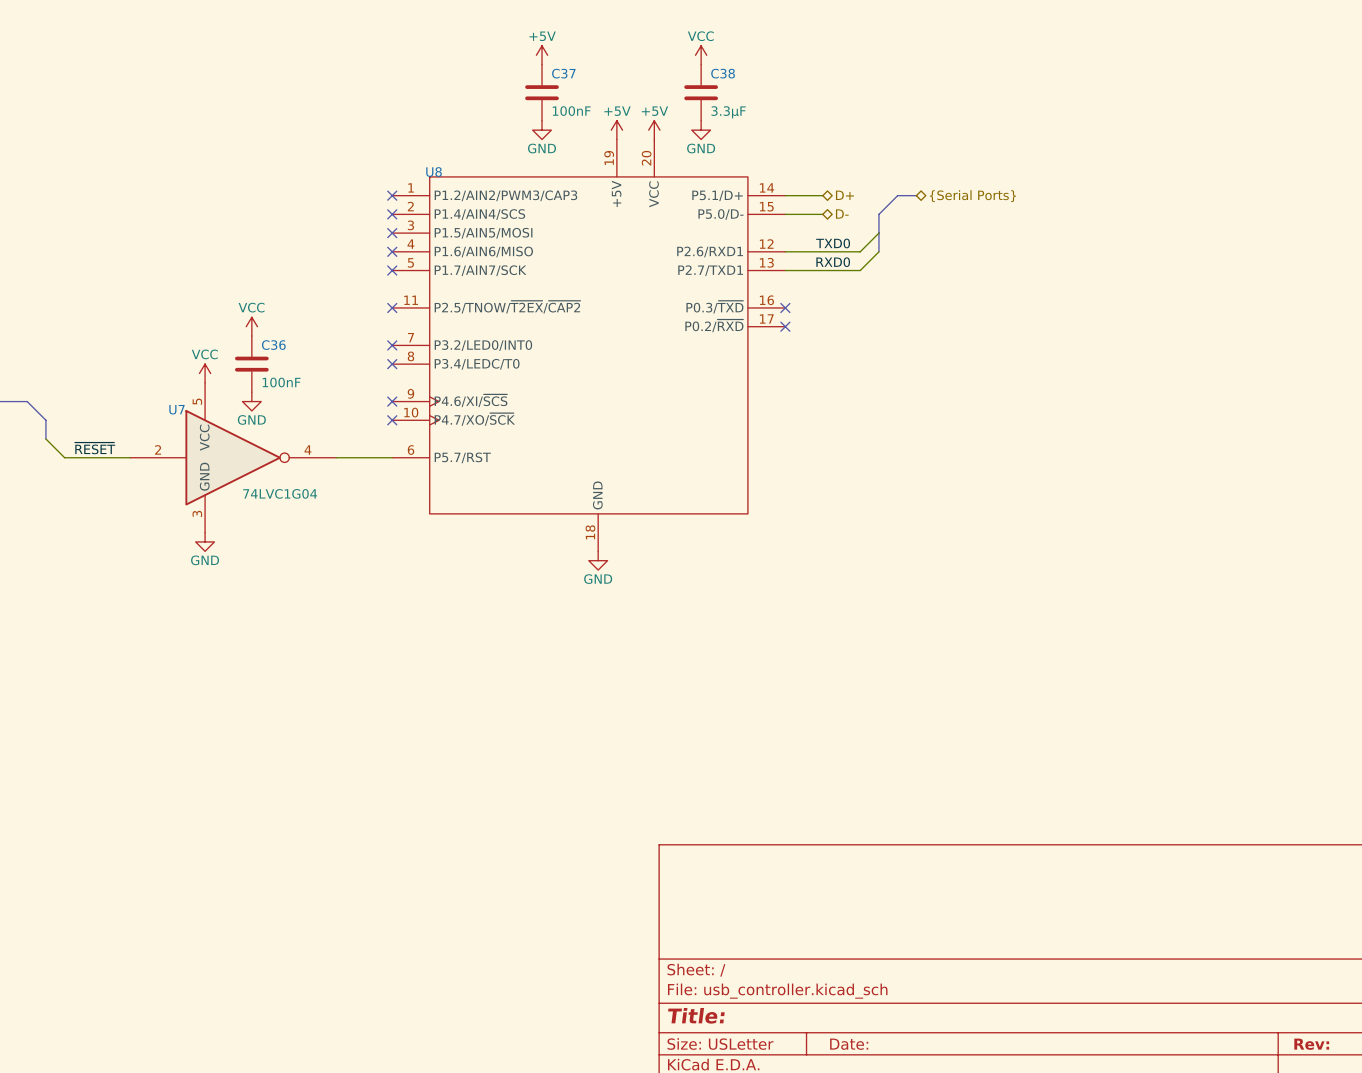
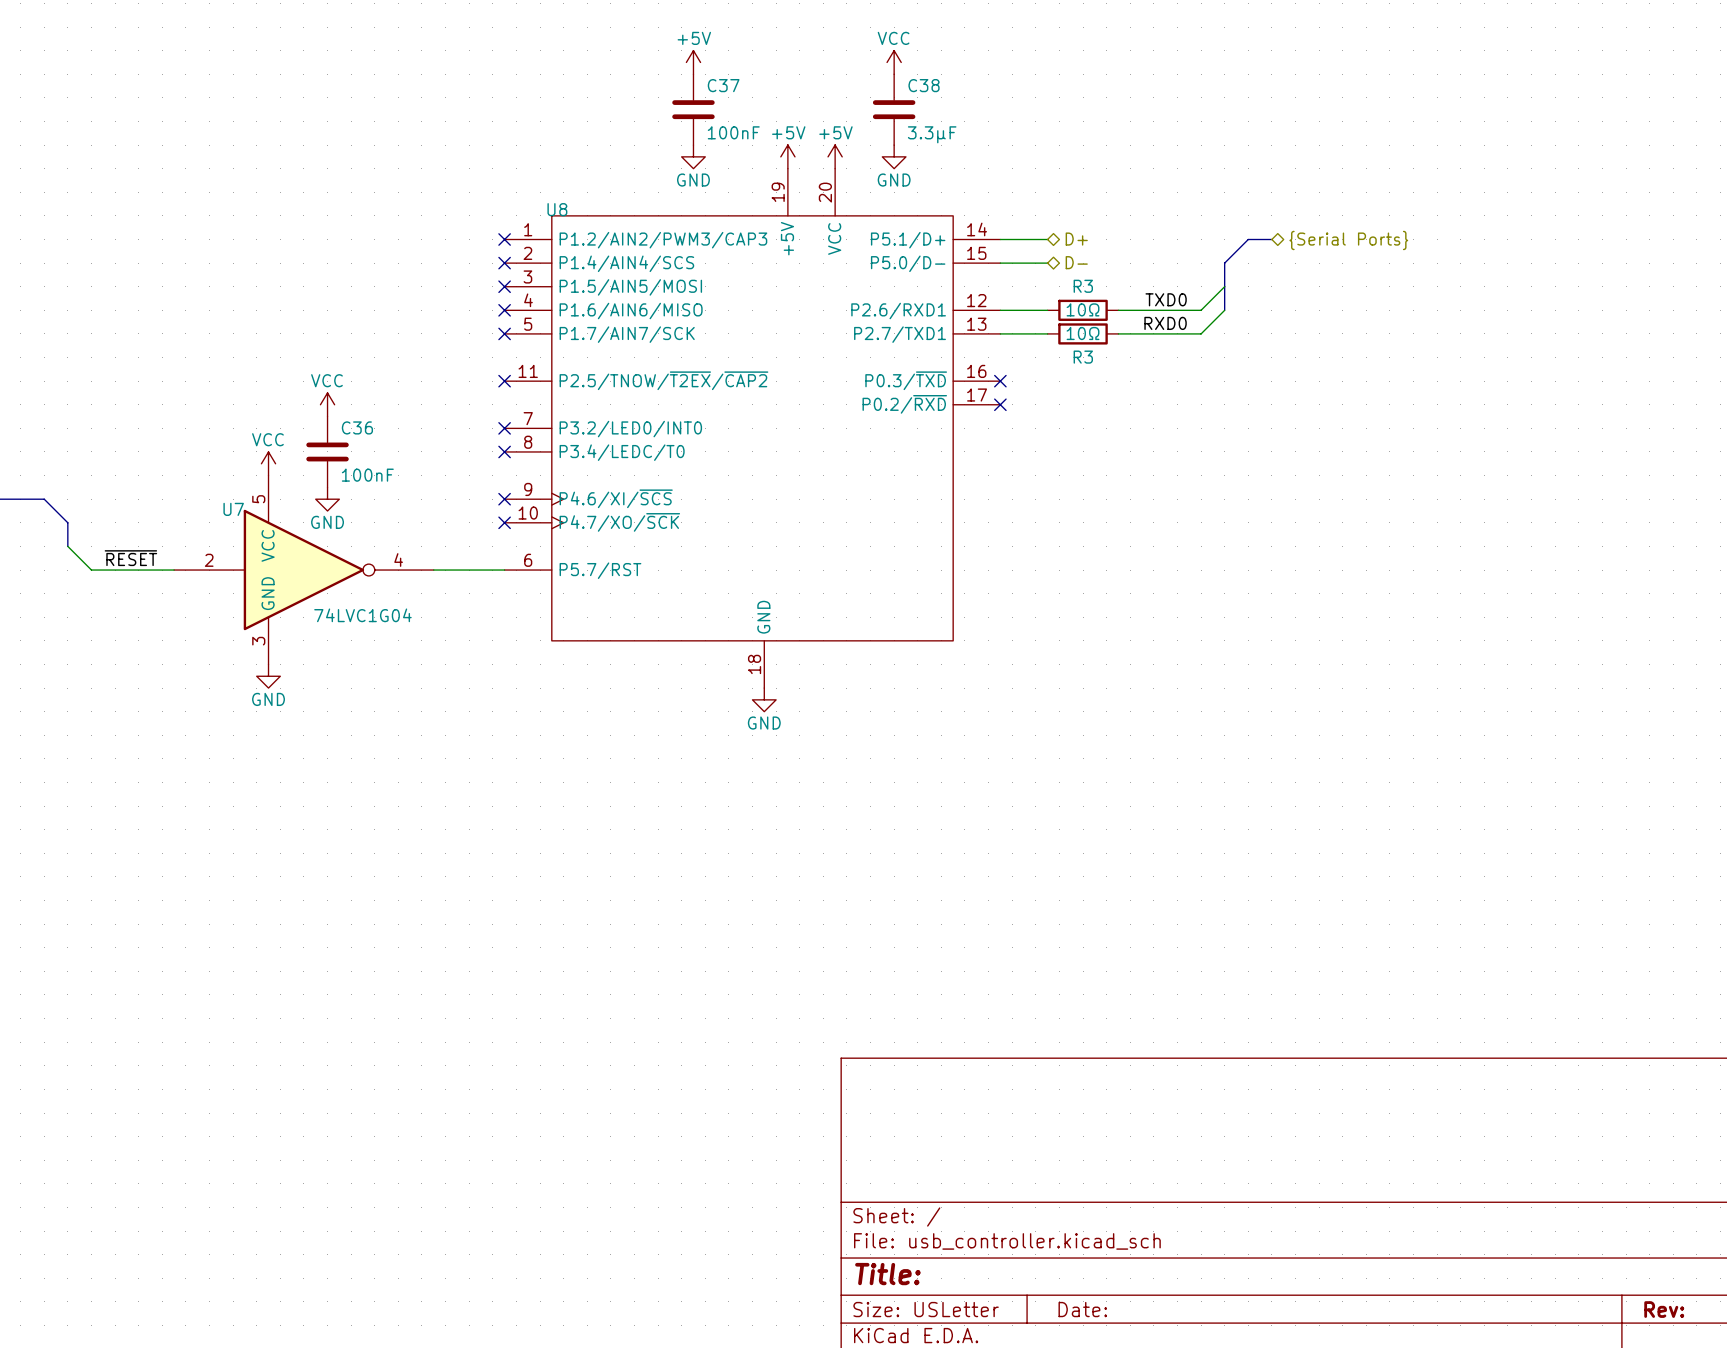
bus: (916, 195) (897, 195) (878, 214) (878, 251) -> (1271, 239) (1248, 239) (1224, 263) (1224, 310)
hierarchical label position: {Serial Ports} (972, 196) -> {Serial Ports} (1348, 240)
wire: (878, 233) (860, 251) (822, 251) -> none
label position: TXD0 (833, 243) -> TXD0 (1166, 299)
R3: none -> 10Ω (1083, 310)
wire: (878, 251) (860, 270) (822, 270) -> (1118, 310) (1201, 310) (1224, 286)
wire: none -> (1224, 310) (1201, 333) (1118, 333)
label position: RXD0 (833, 262) -> RXD0 (1165, 323)
R3: none -> 10Ω (1083, 333)

